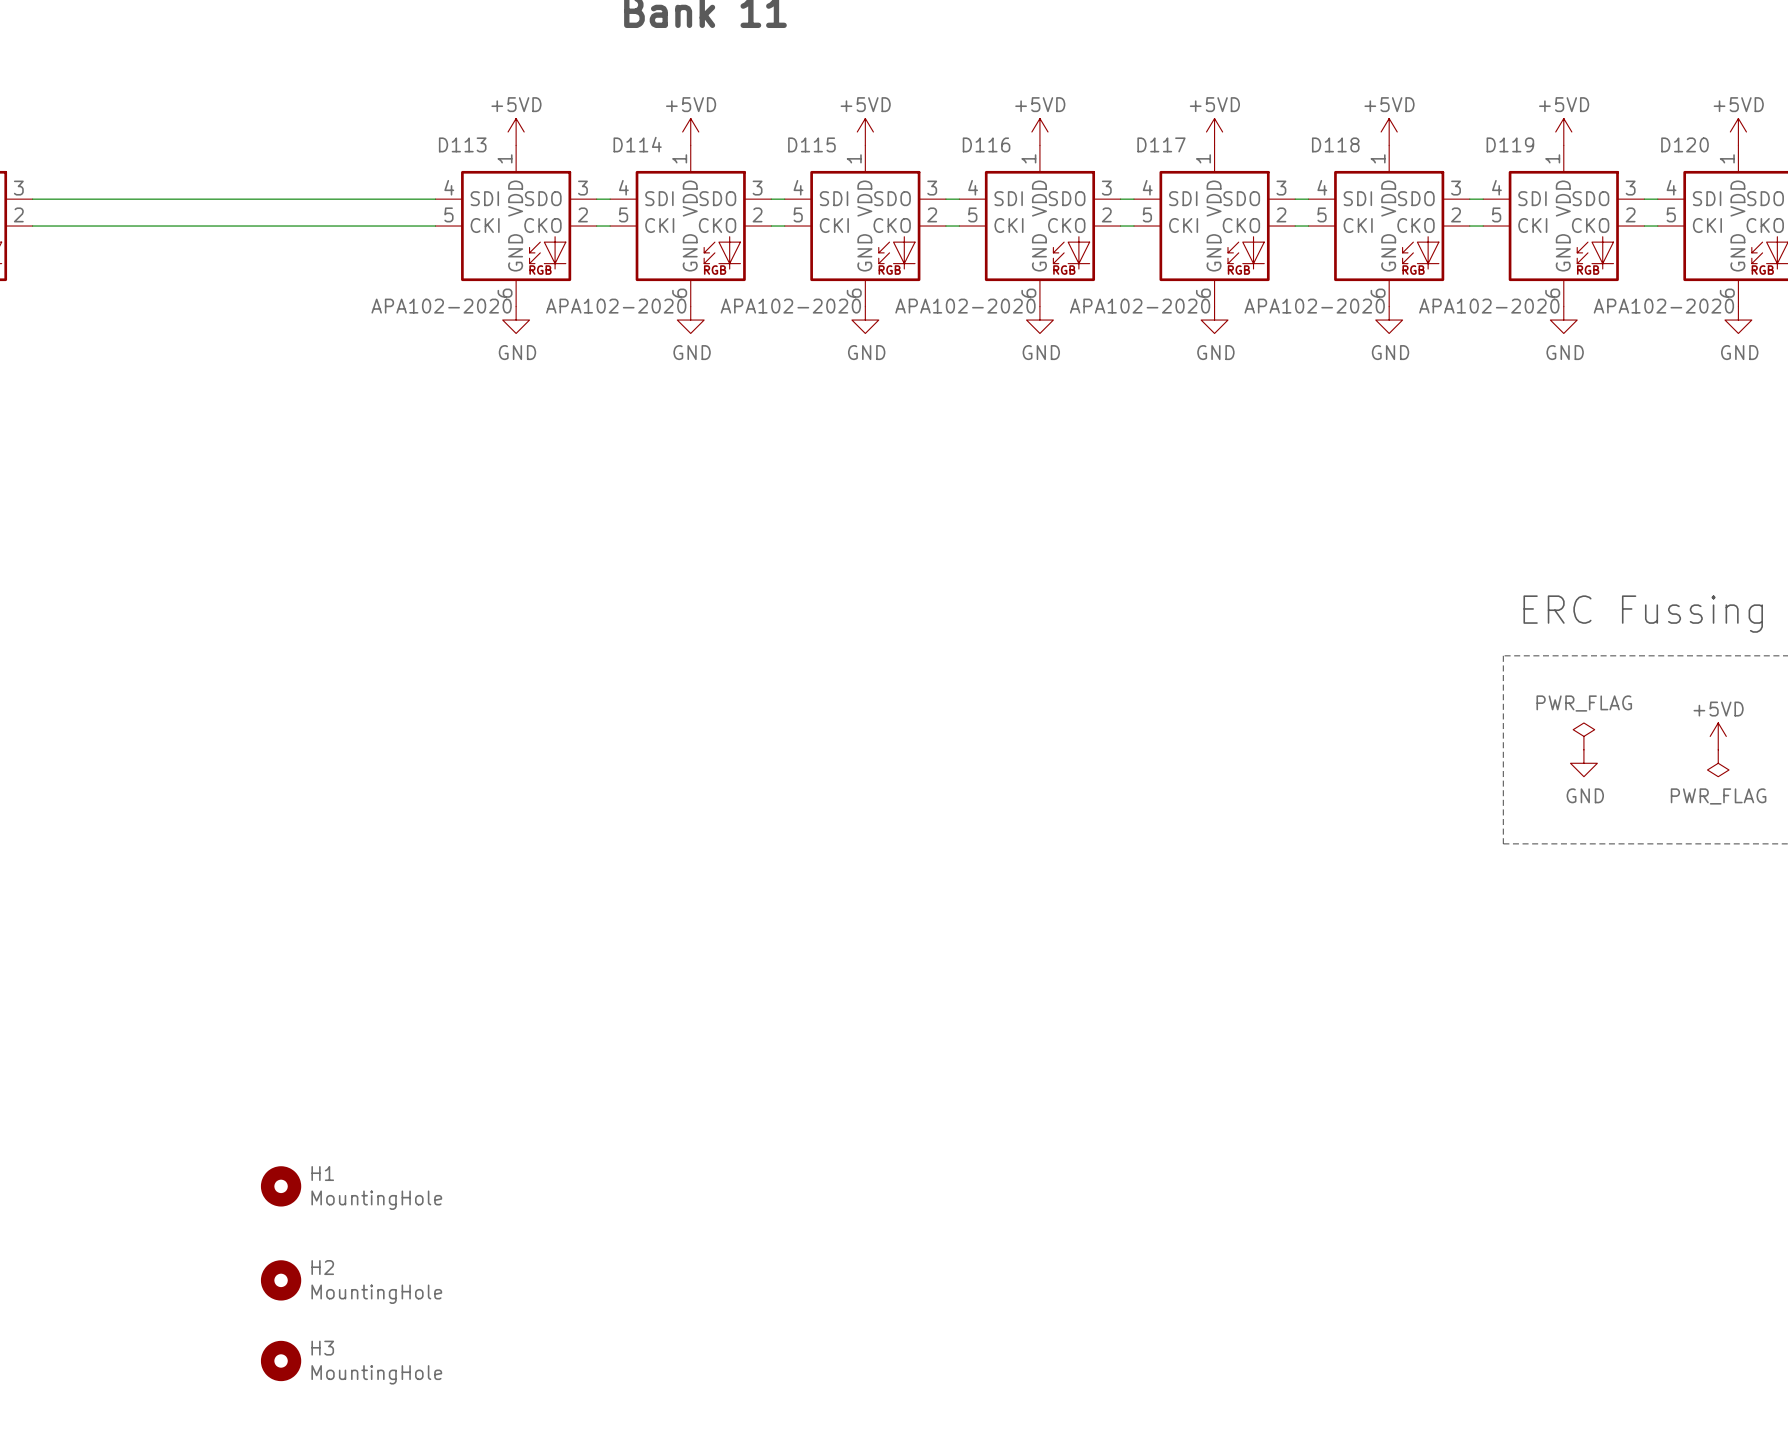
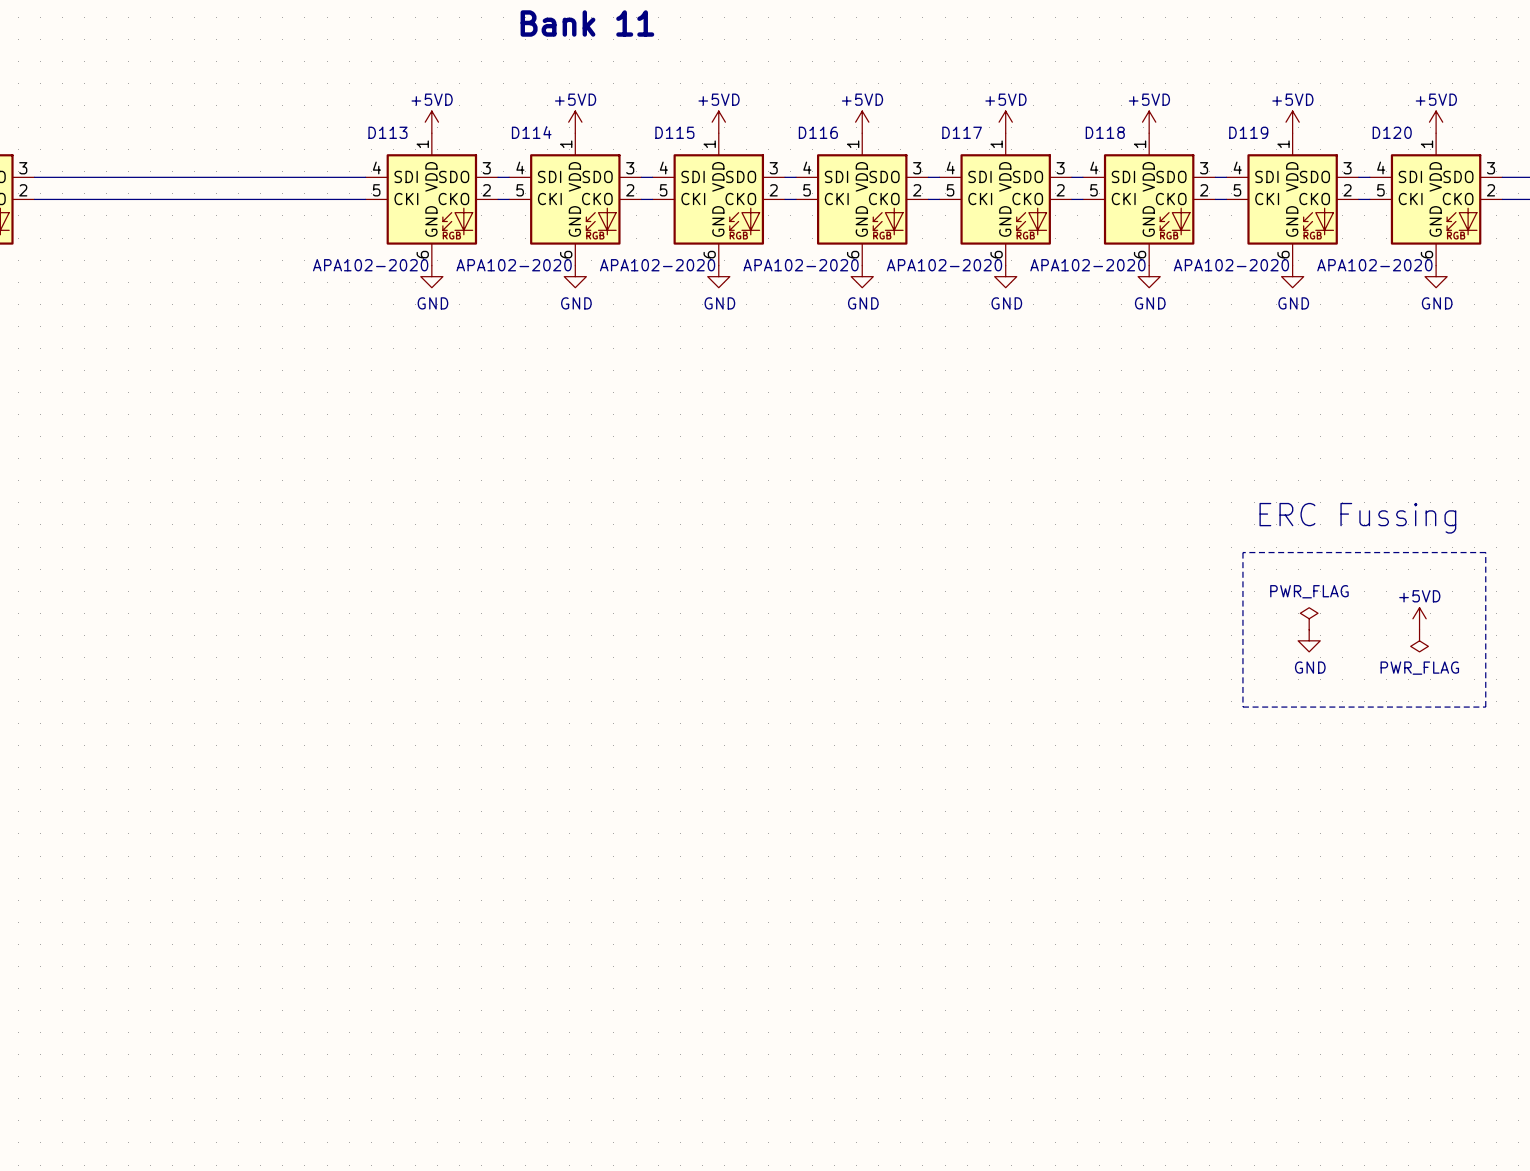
H1: MountingHole (281, 1186) -> none
H2: MountingHole (281, 1280) -> none
H3: MountingHole (281, 1360) -> none

